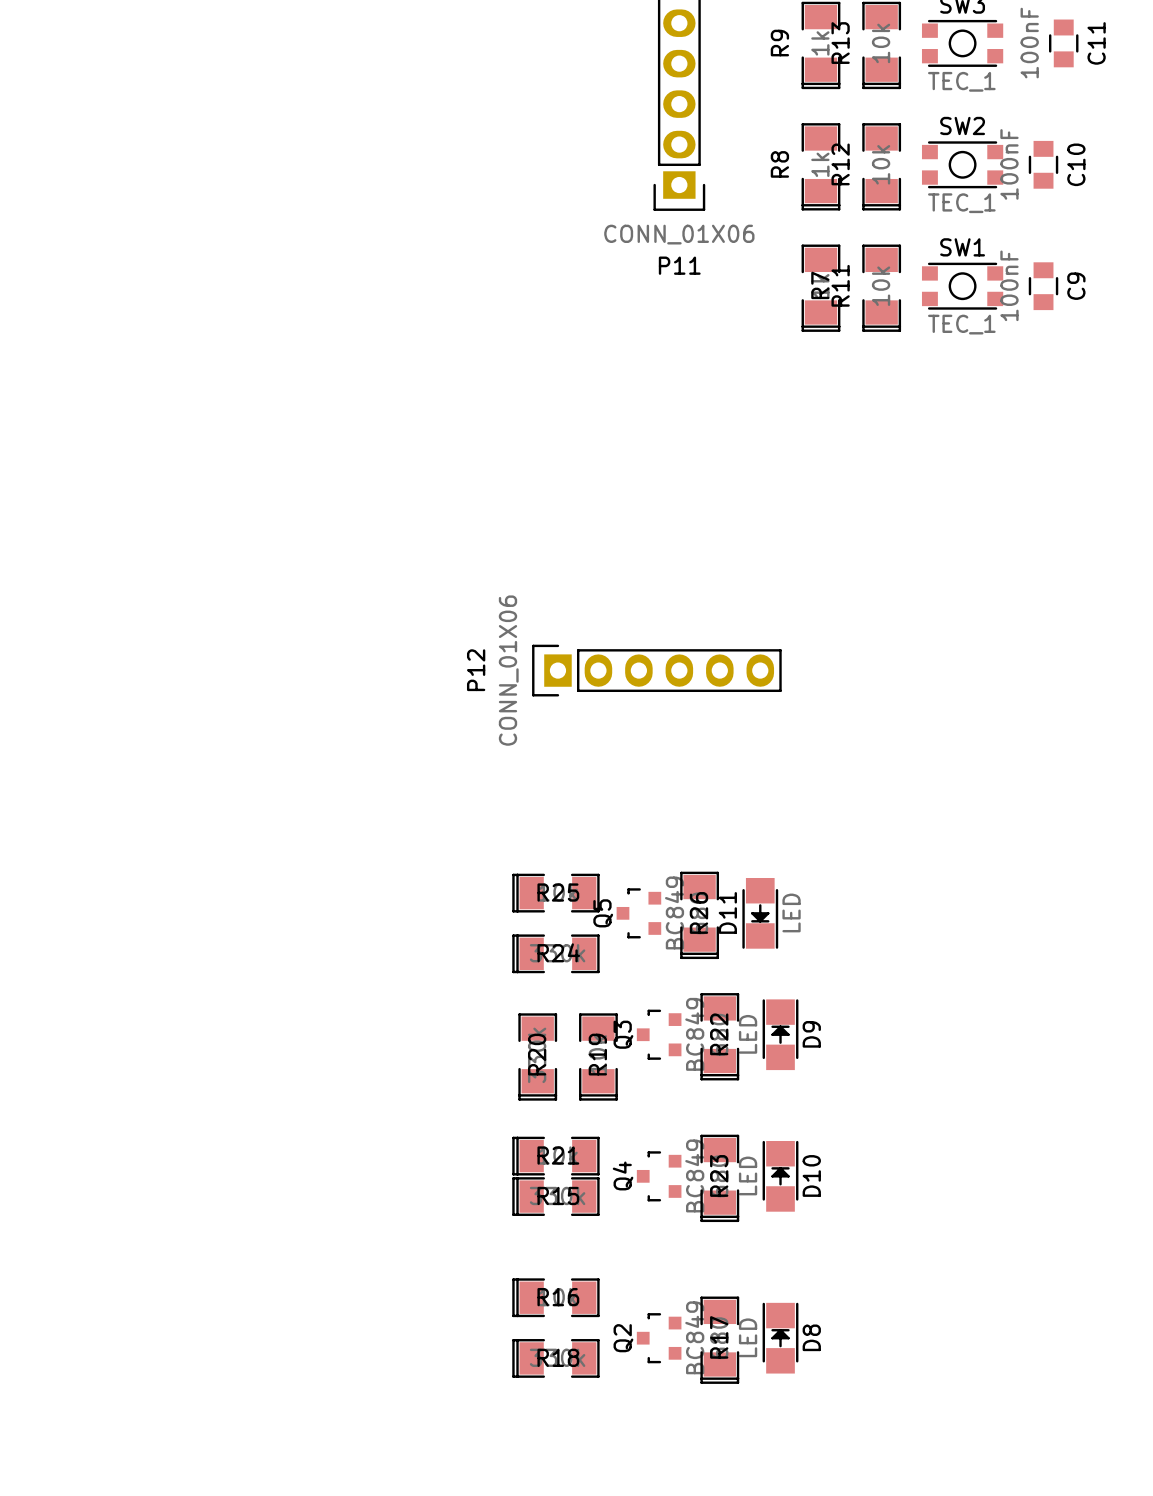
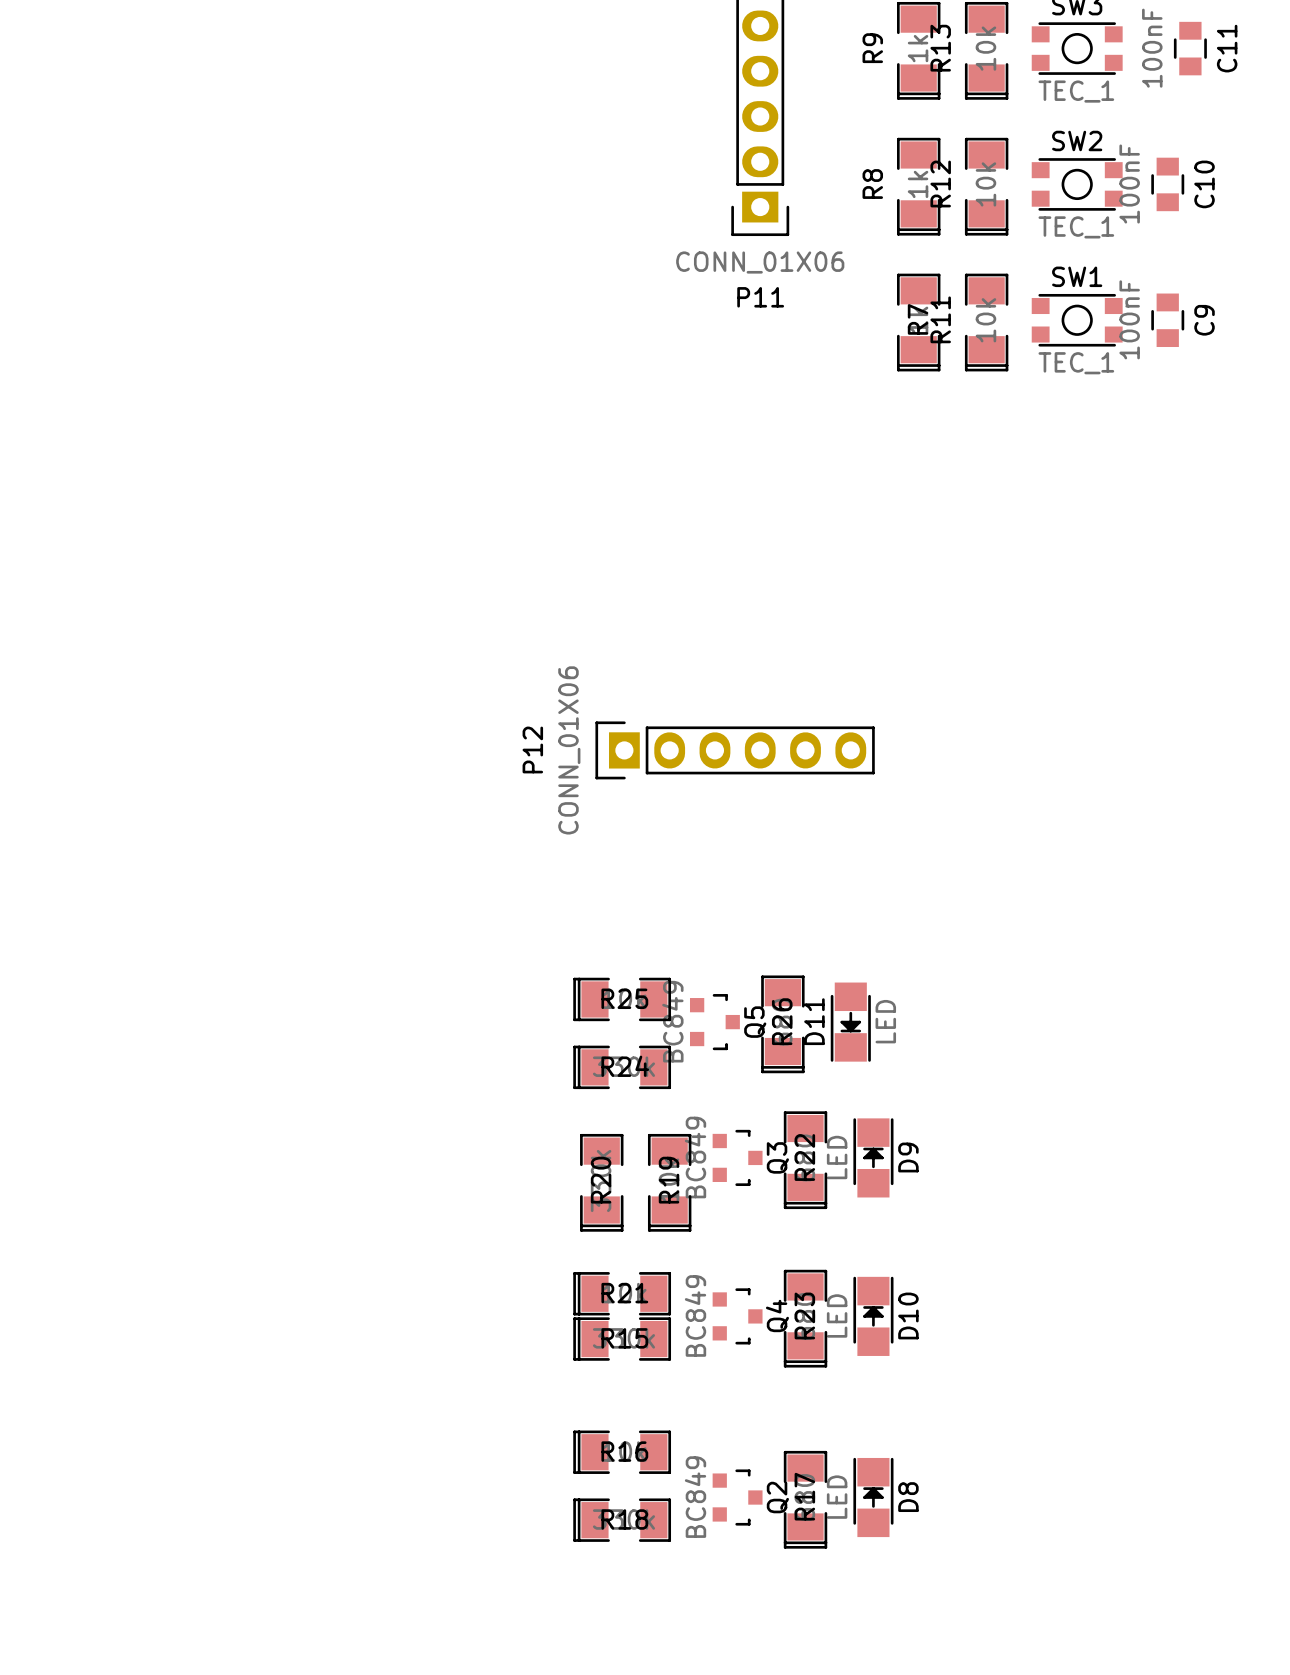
Q5 rotation: 0° (638, 913) -> 180° (714, 1022)
Q3 rotation: 0° (659, 1034) -> 180° (737, 1157)
Q4 rotation: 0° (659, 1176) -> 180° (737, 1316)
Q2 rotation: 0° (659, 1338) -> 180° (737, 1497)

